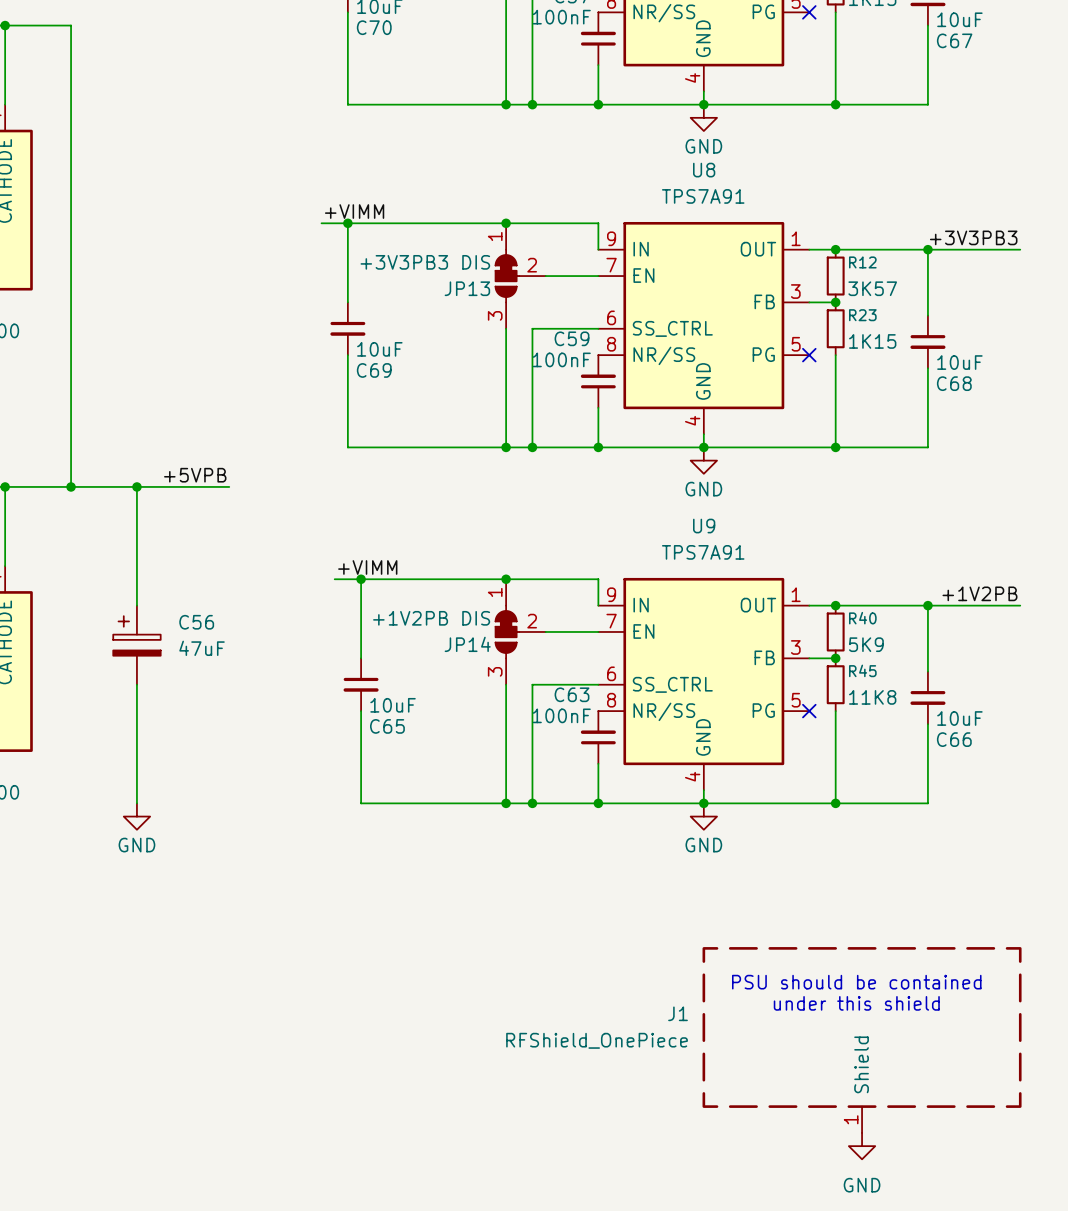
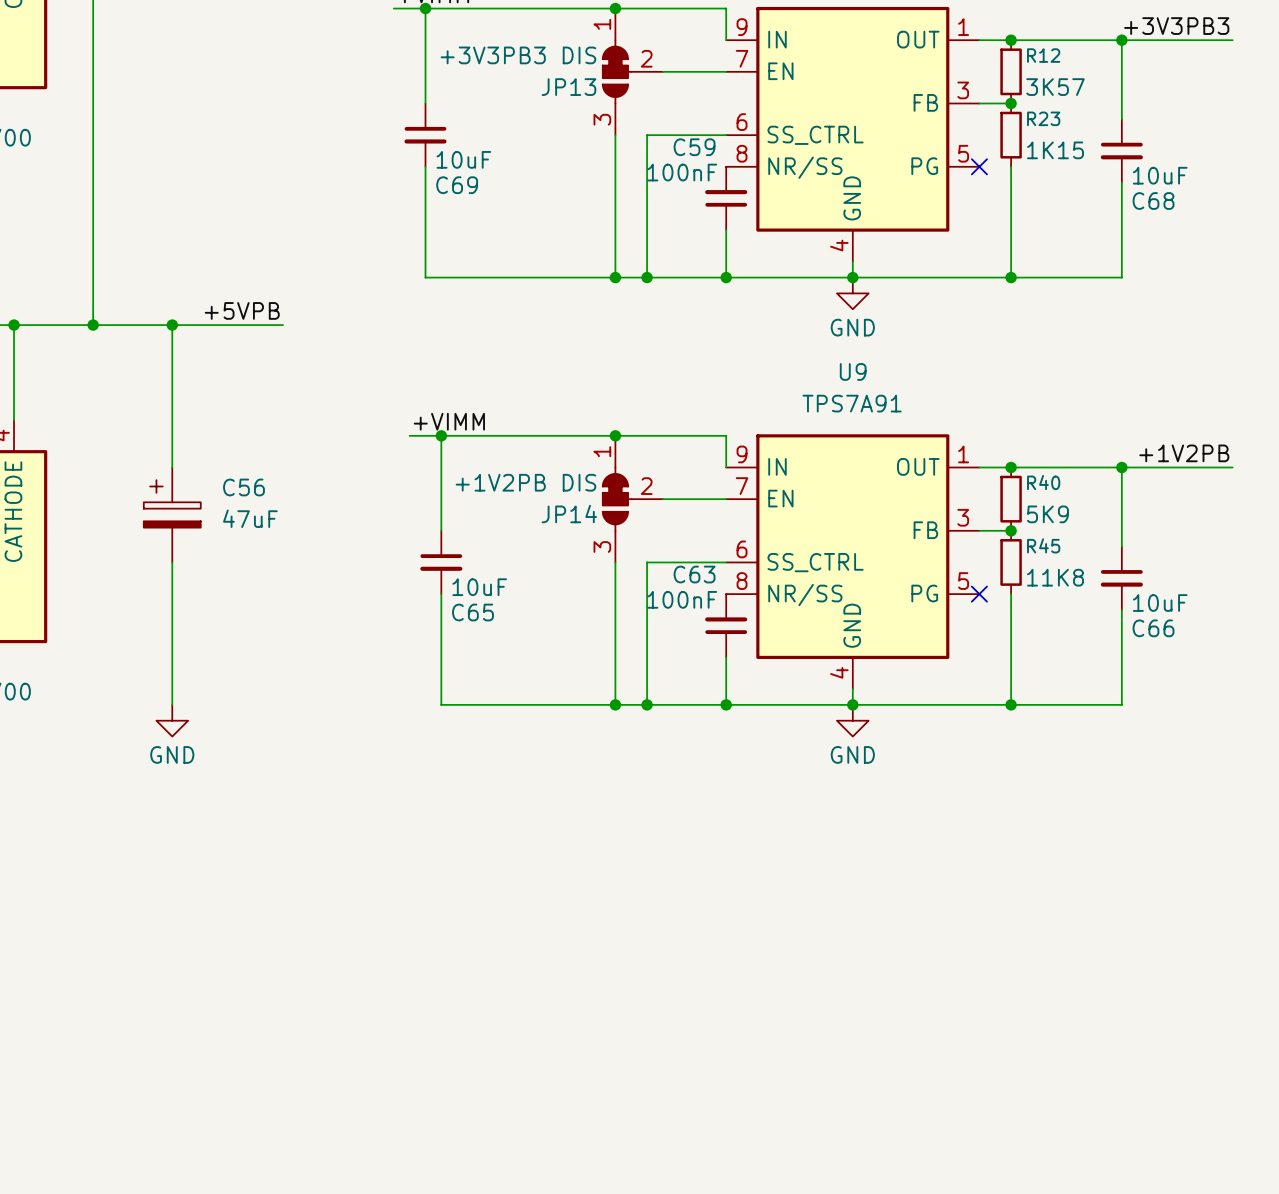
text: PSU should be contained (856, 982) -> none
text: under this shield (856, 1003) -> none
J1: RFShield_OnePiece (862, 1040) -> none
power symbol: GND (862, 1146) -> none

